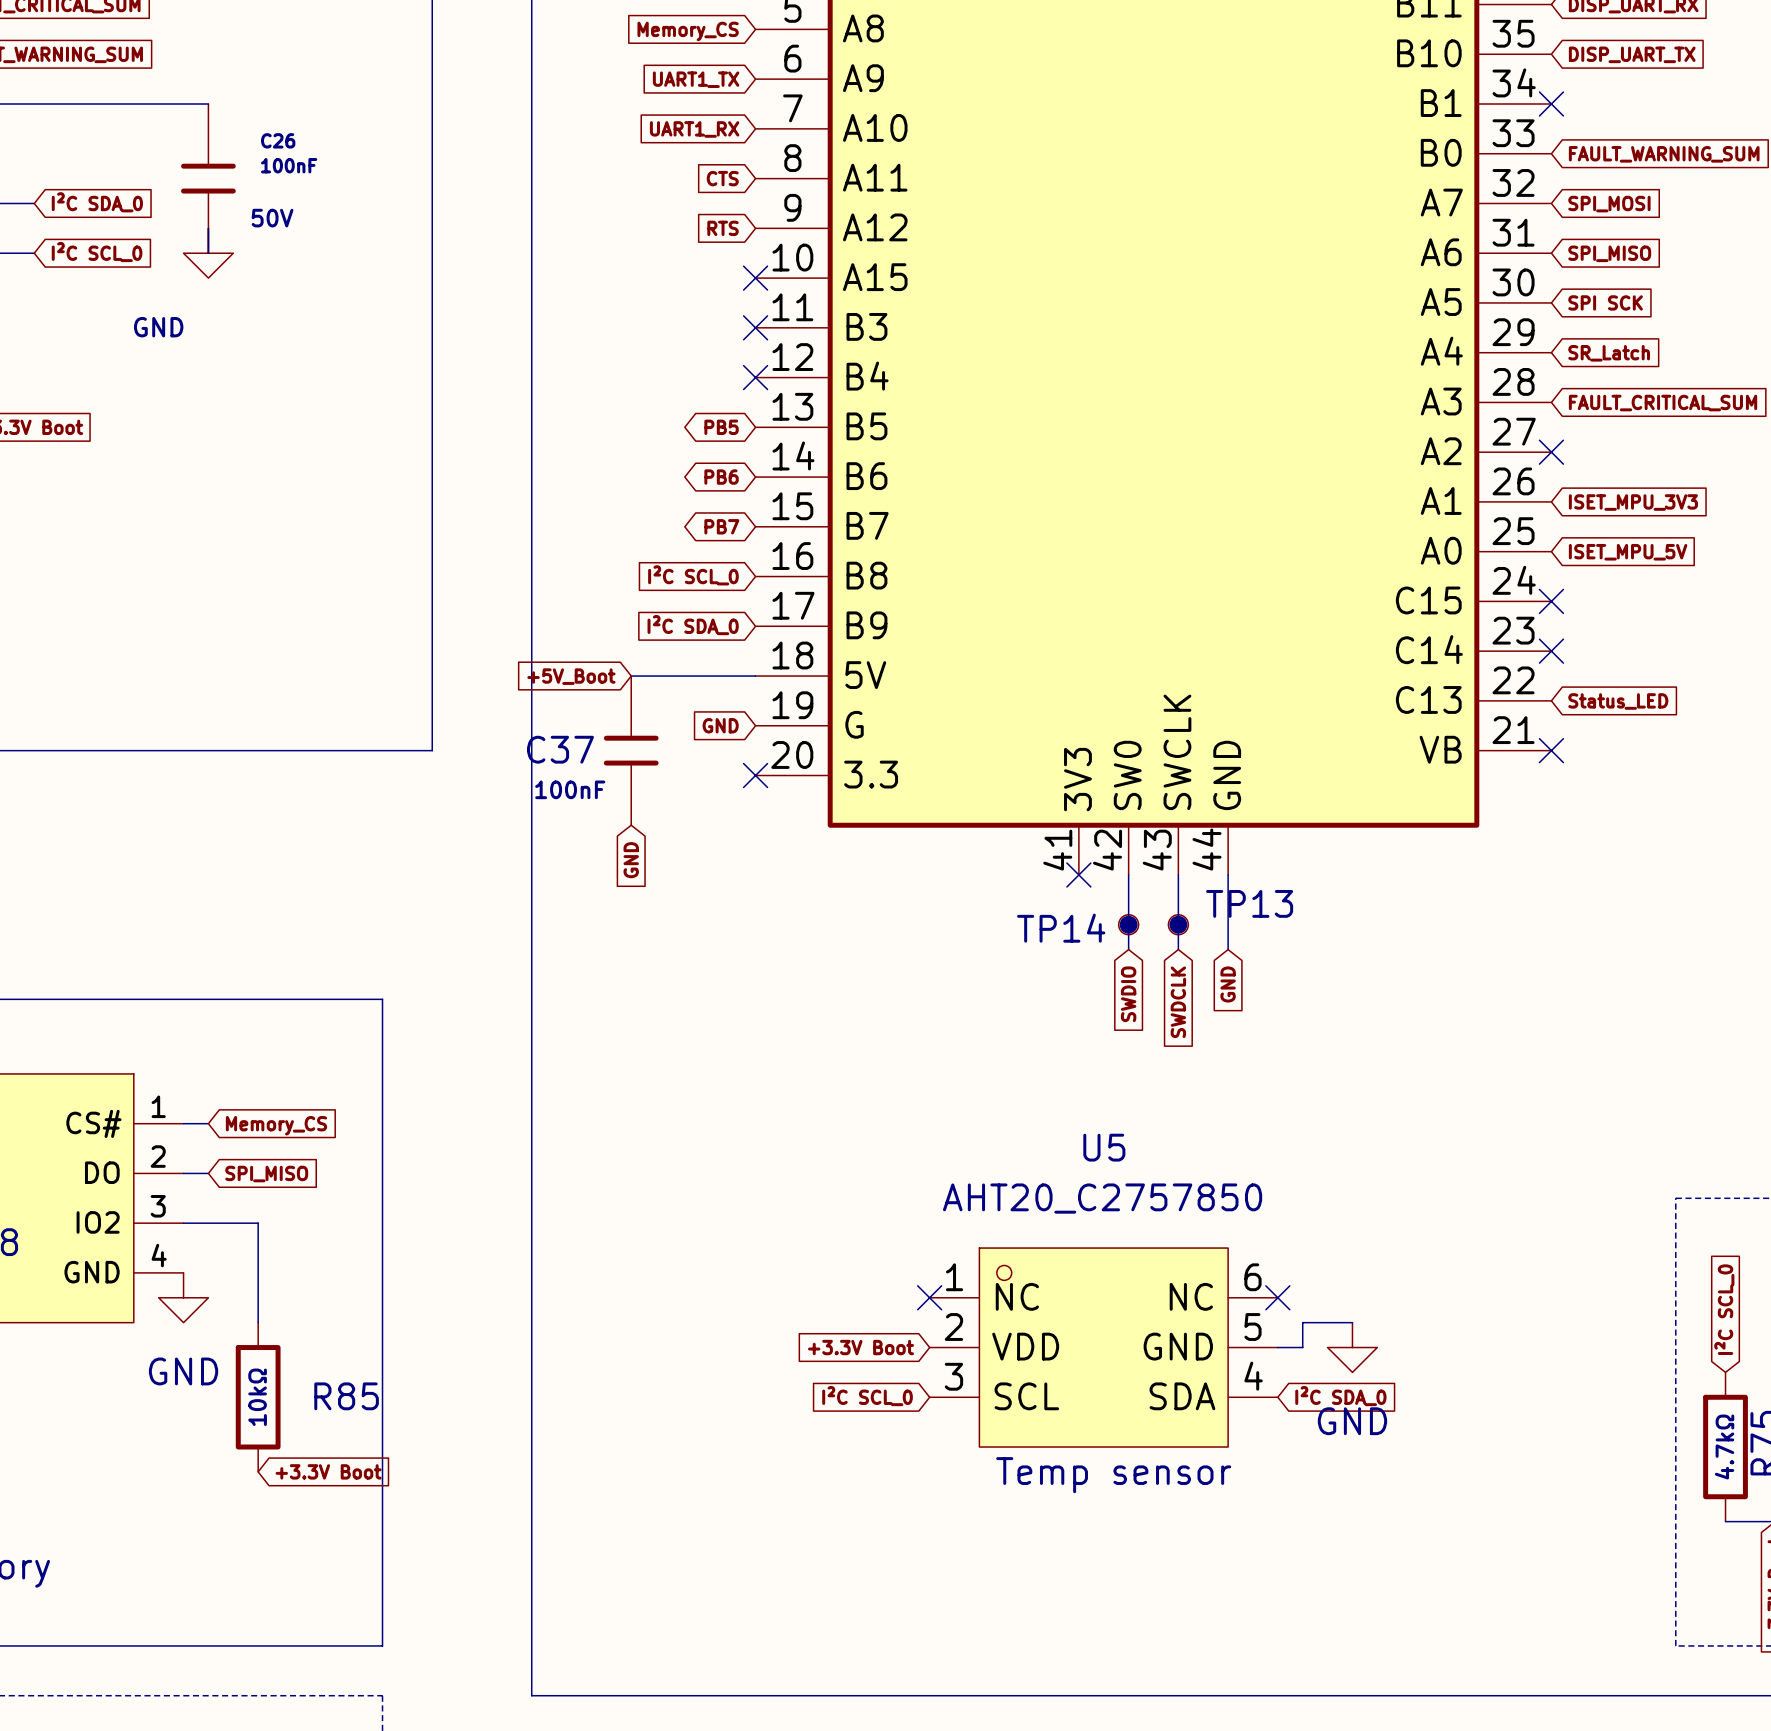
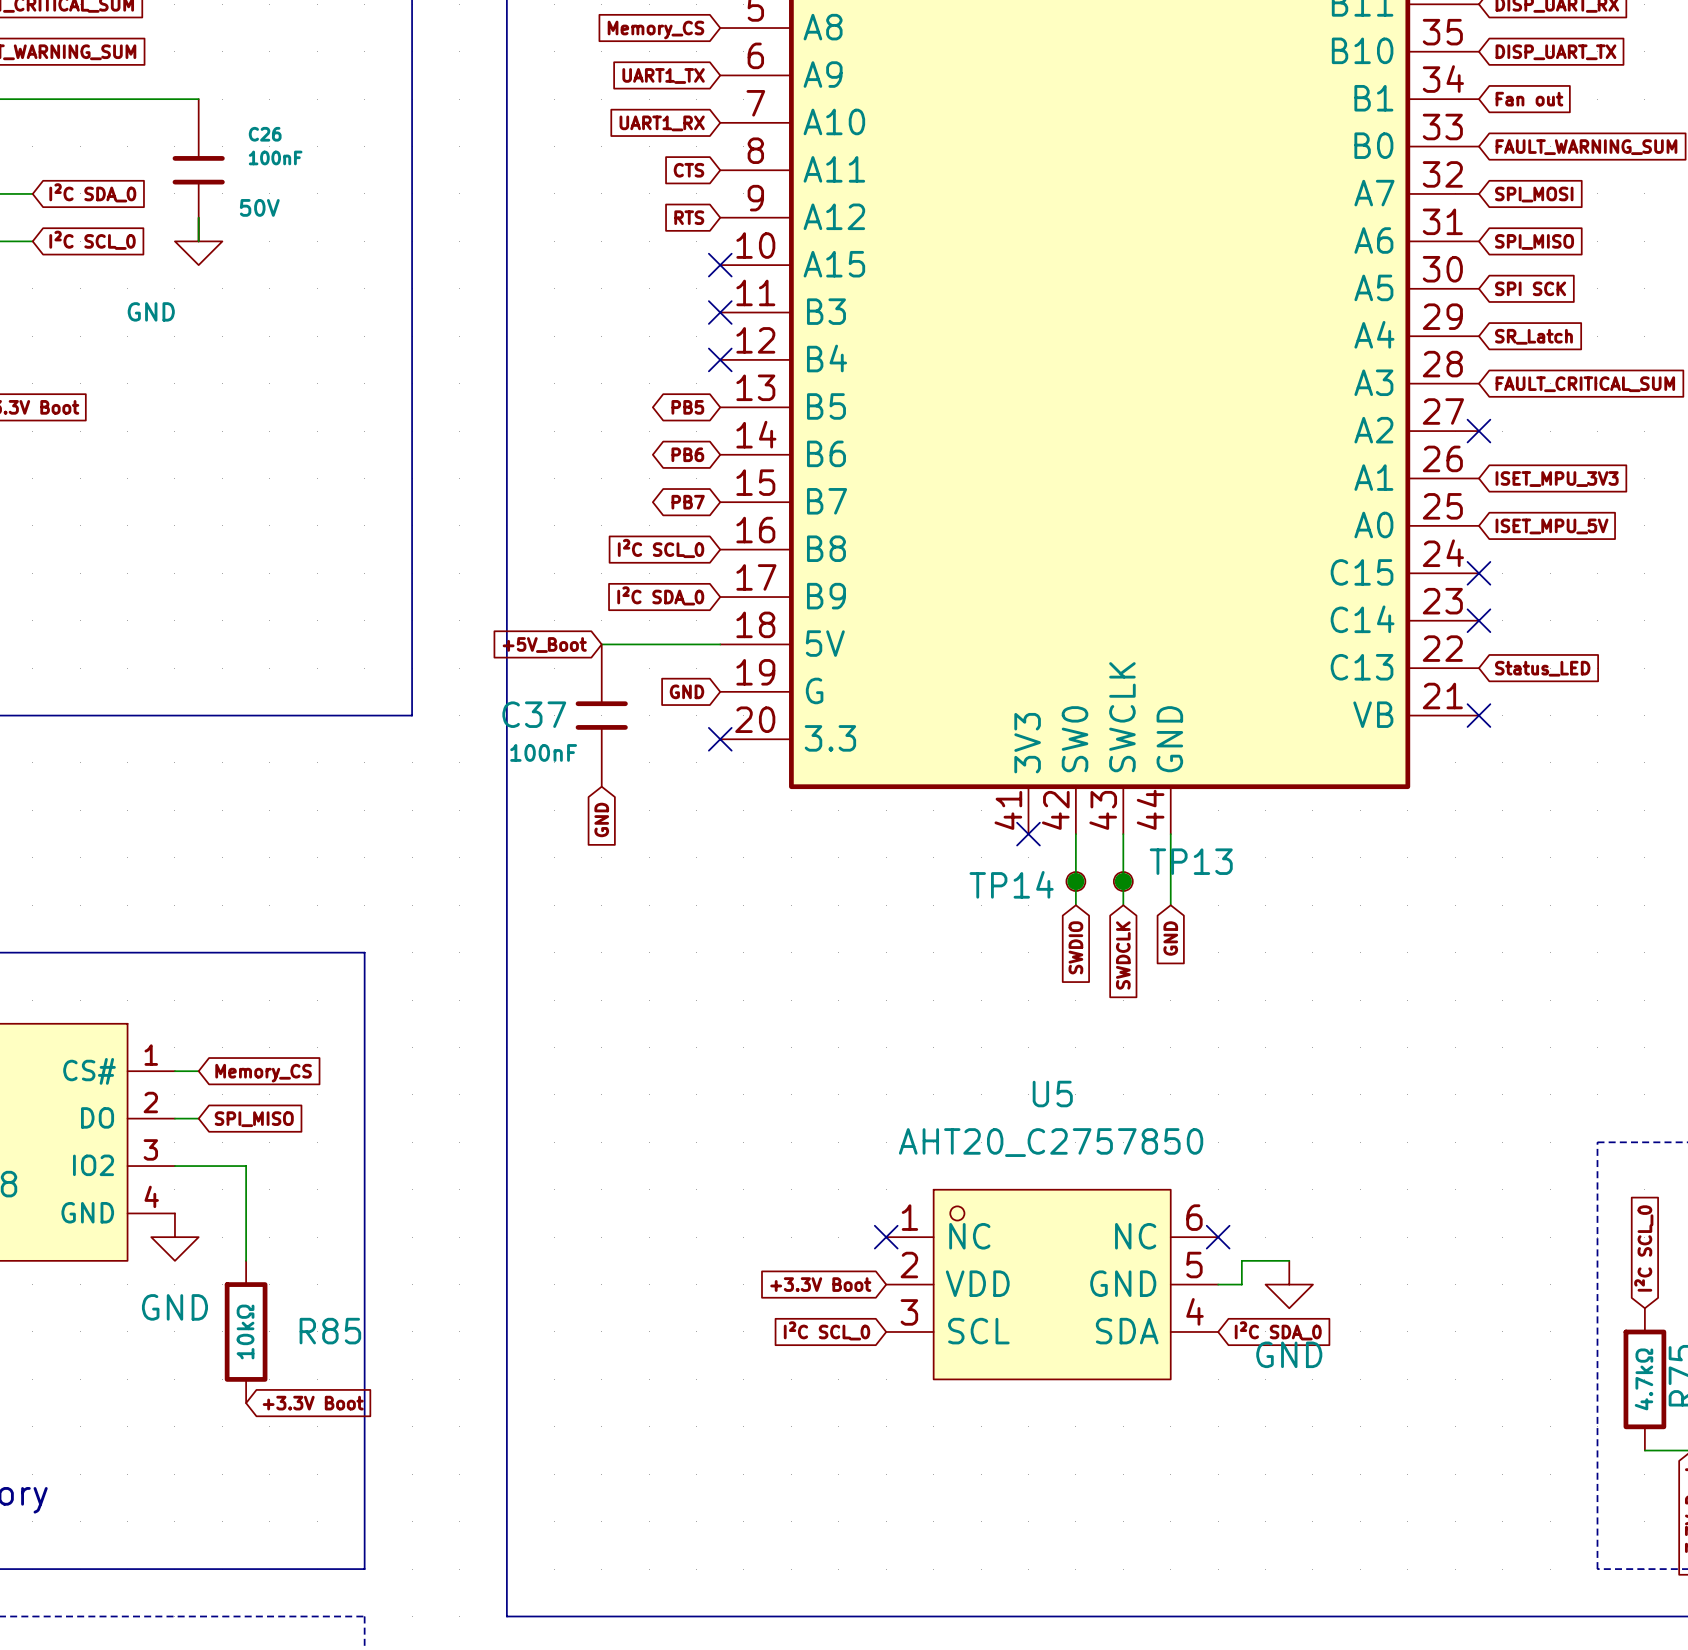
no-connect mark: (1551, 104) -> none
global label: none -> Fan out (1529, 99)
text: Temp sensor (1113, 1475) -> none

